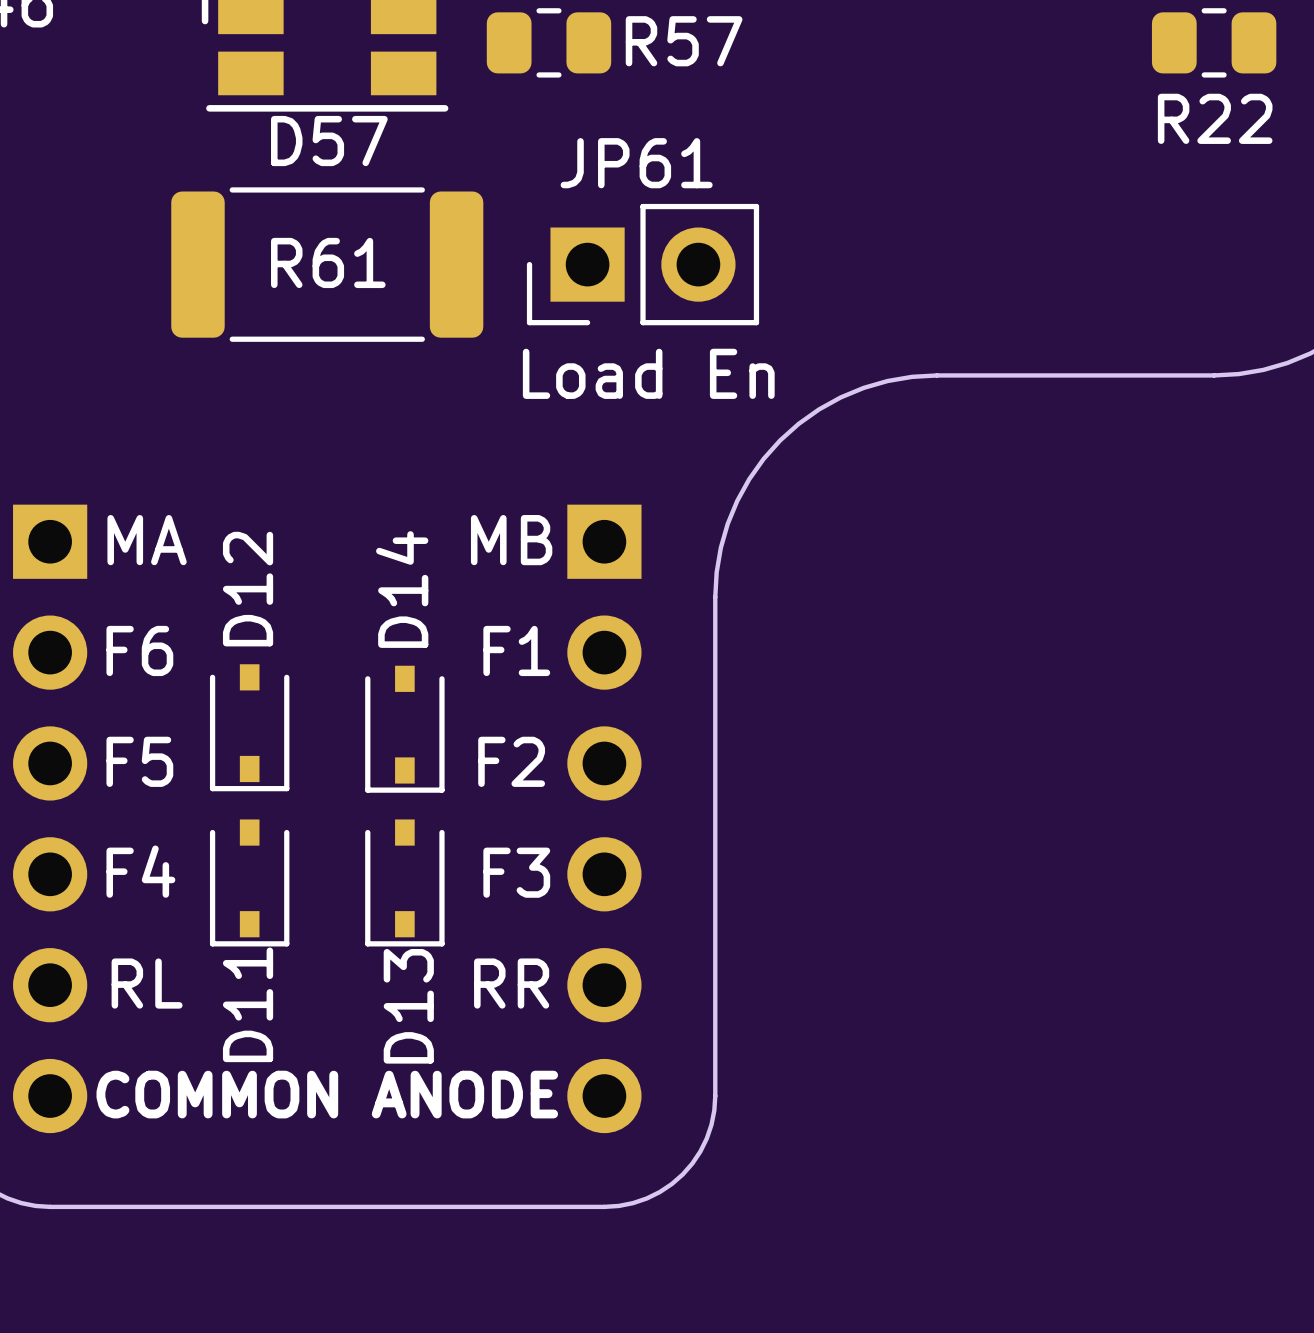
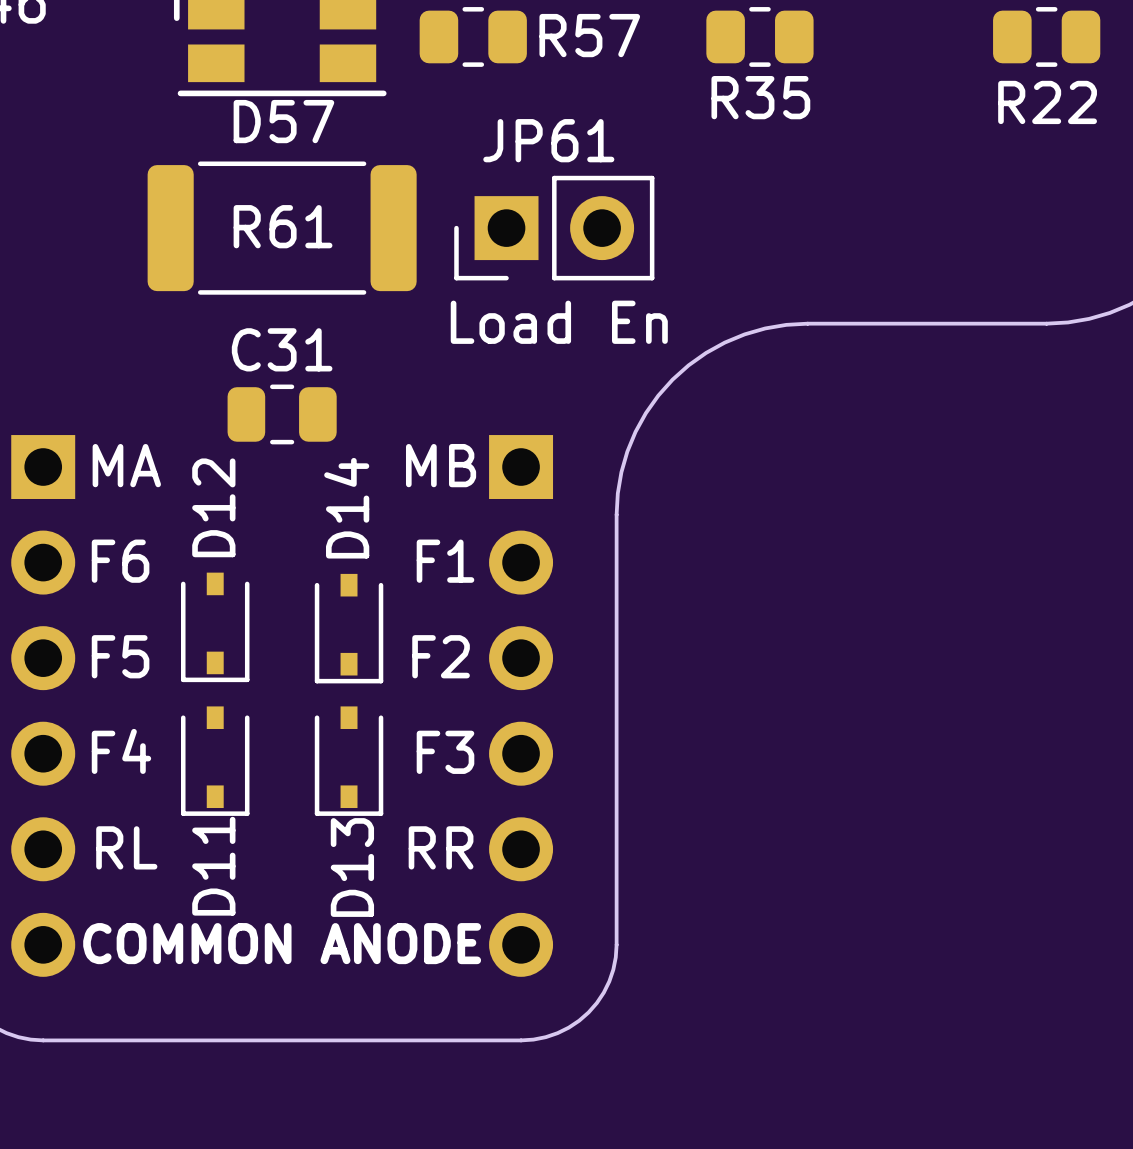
R35: none -> (759, 36)
C31: none -> (282, 414)

